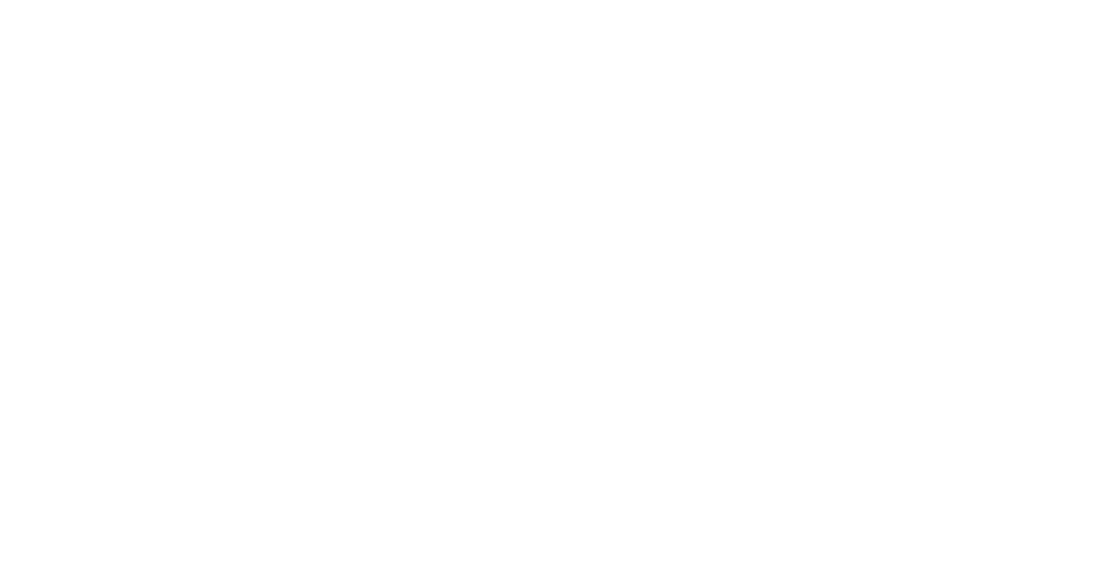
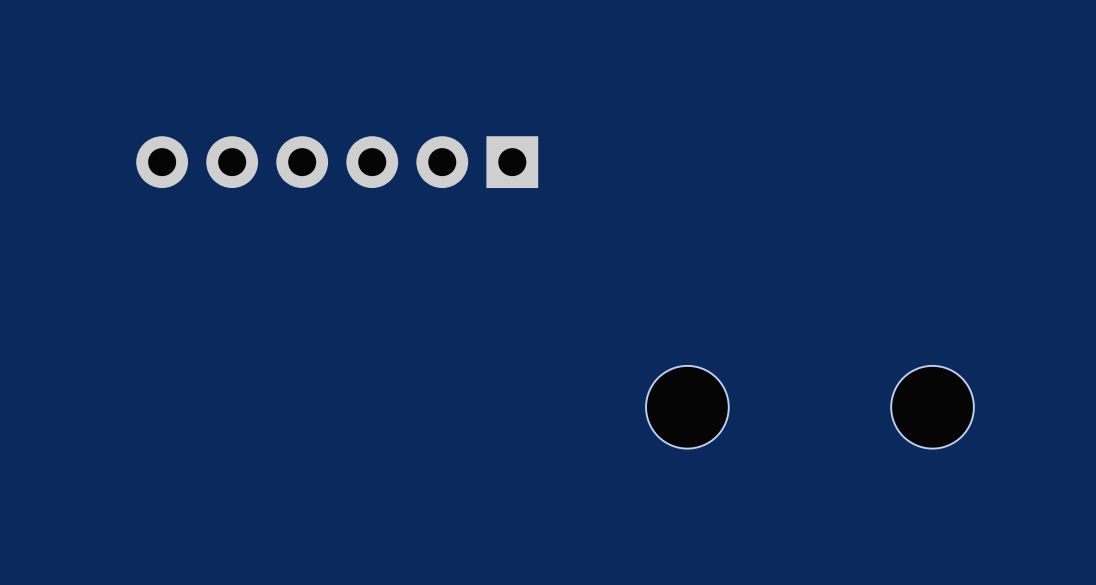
part: none -> (337, 162)
part: none -> (687, 407)
part: none -> (932, 407)

